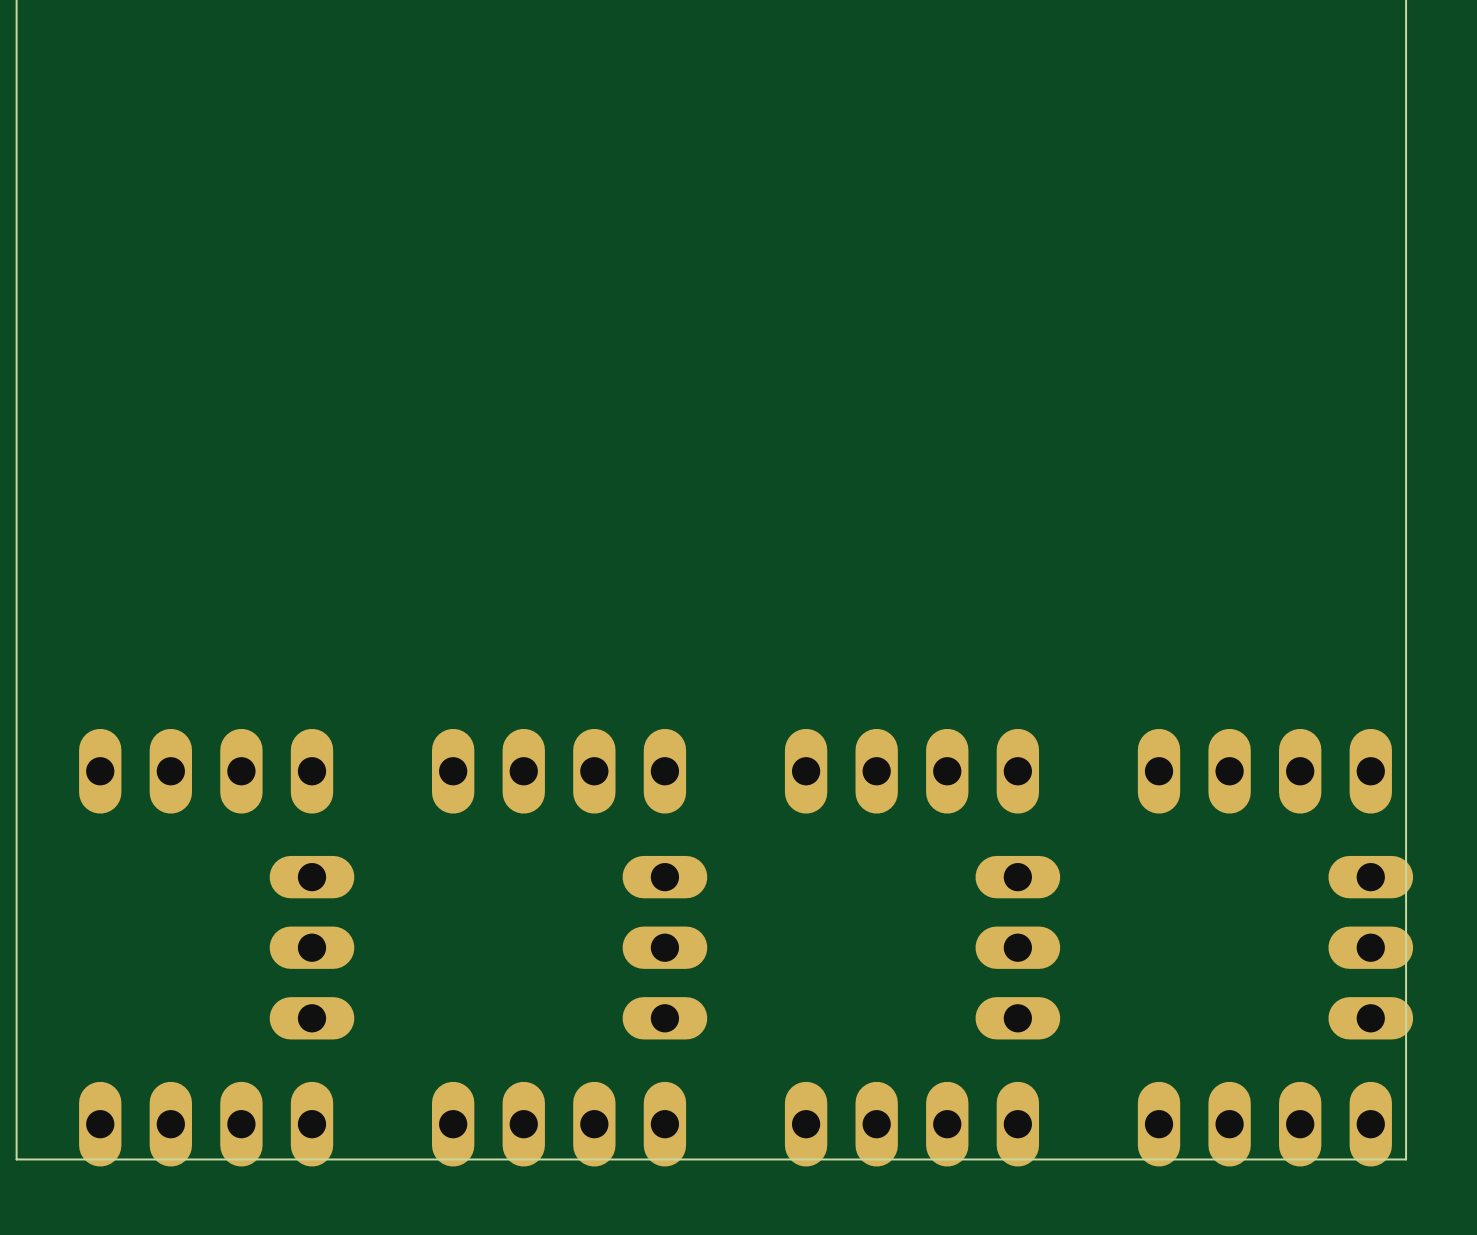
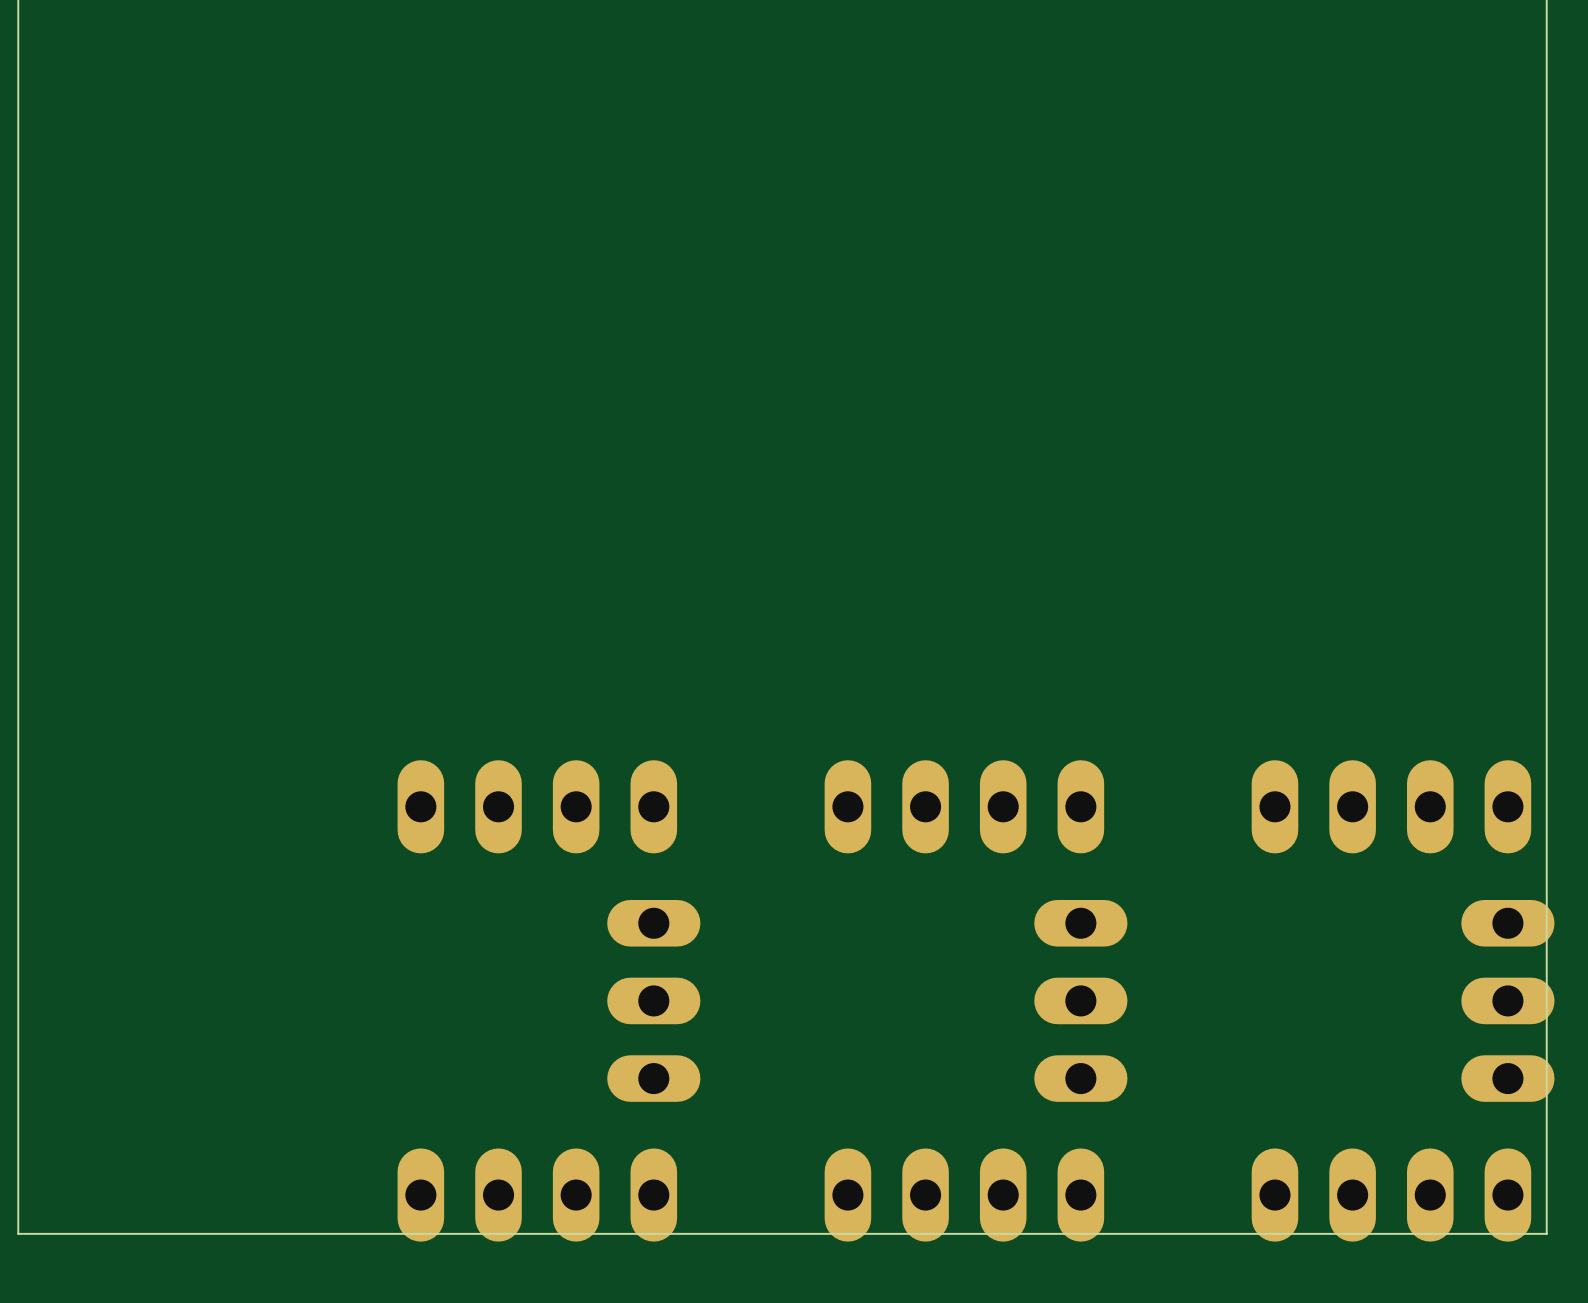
part: (206, 771) -> none
part position: (559, 771) -> (537, 806)
part position: (911, 771) -> (964, 806)
part: (312, 947) -> none
part position: (664, 947) -> (653, 1000)
part position: (1017, 947) -> (1080, 1000)
part: (206, 1124) -> none
part position: (559, 1124) -> (537, 1195)
part position: (911, 1124) -> (964, 1195)

